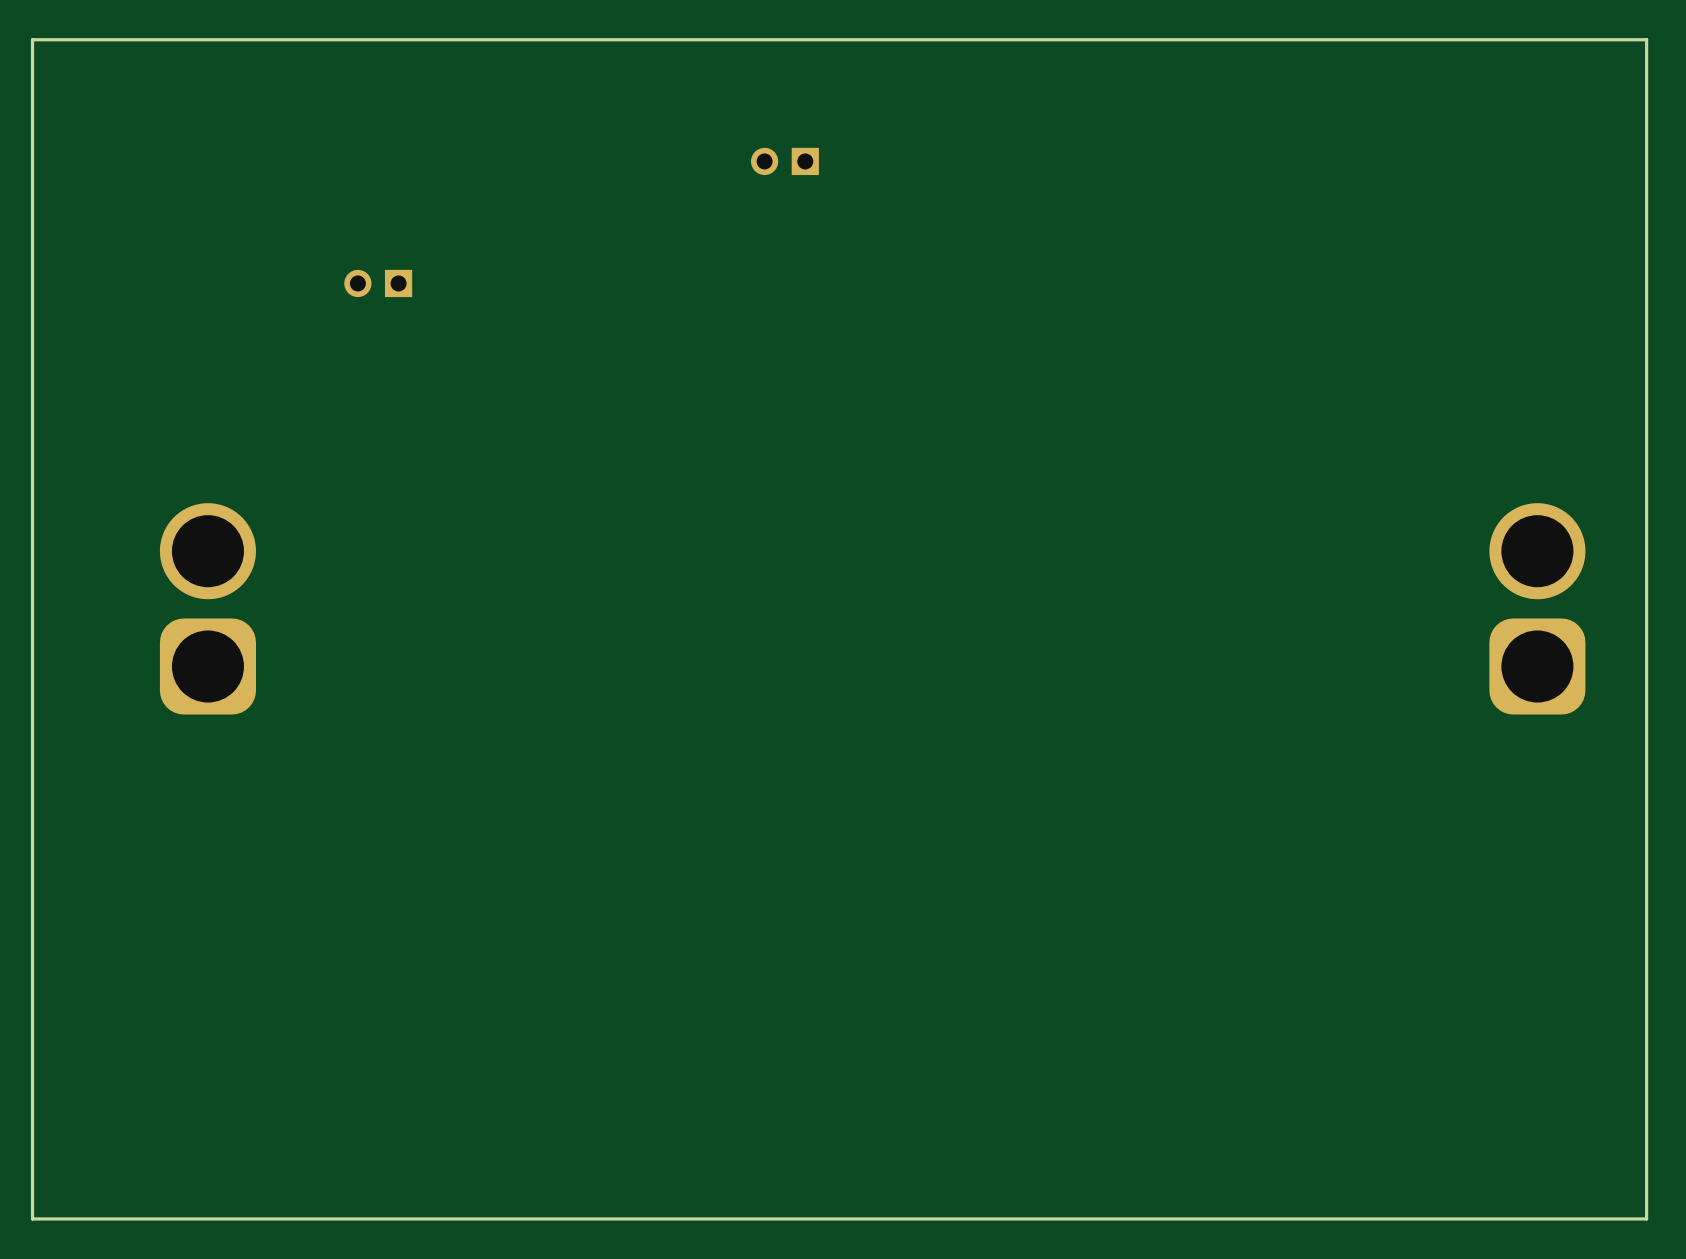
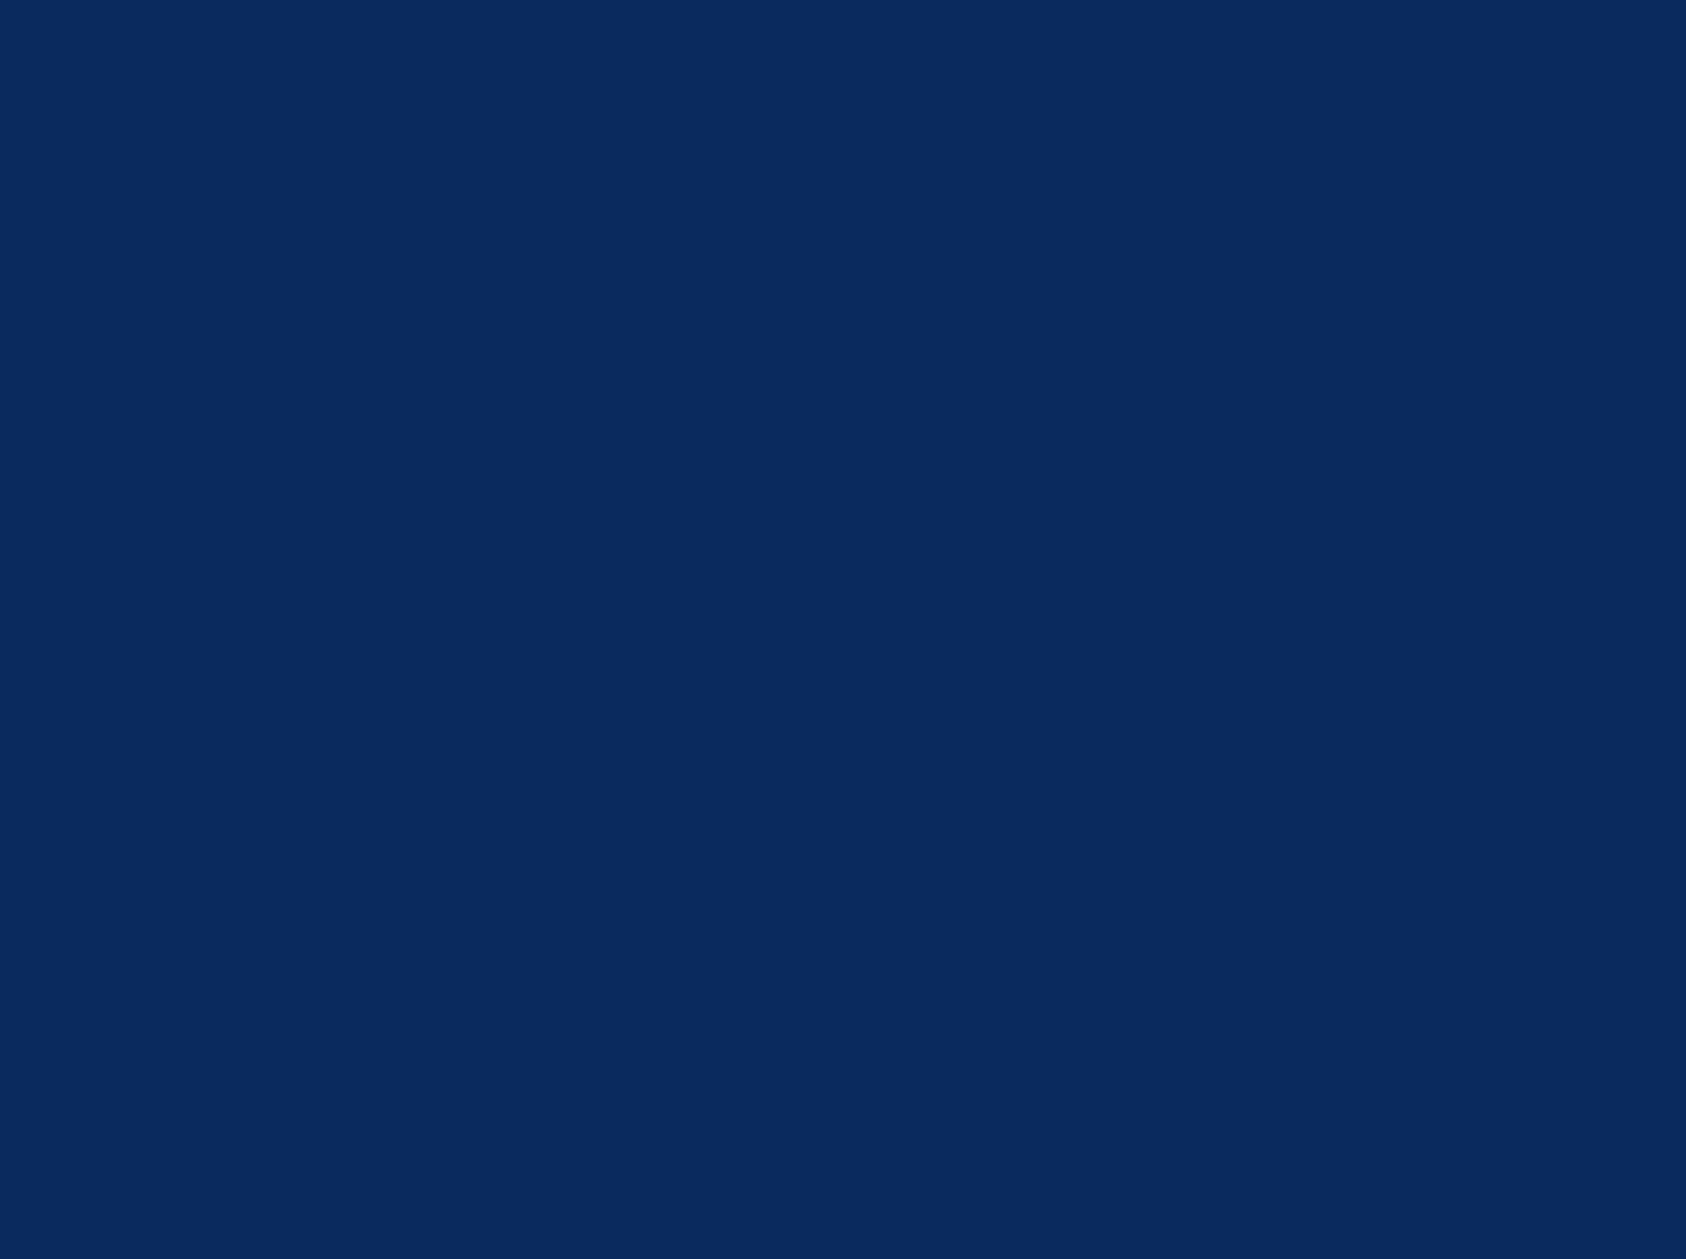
board edge: (1646, 39) (32, 39) (32, 1218) (1646, 1218) (1646, 39) -> none
part: (784, 161) -> none
part: (378, 283) -> none
part: (207, 608) -> none
part: (1537, 608) -> none

